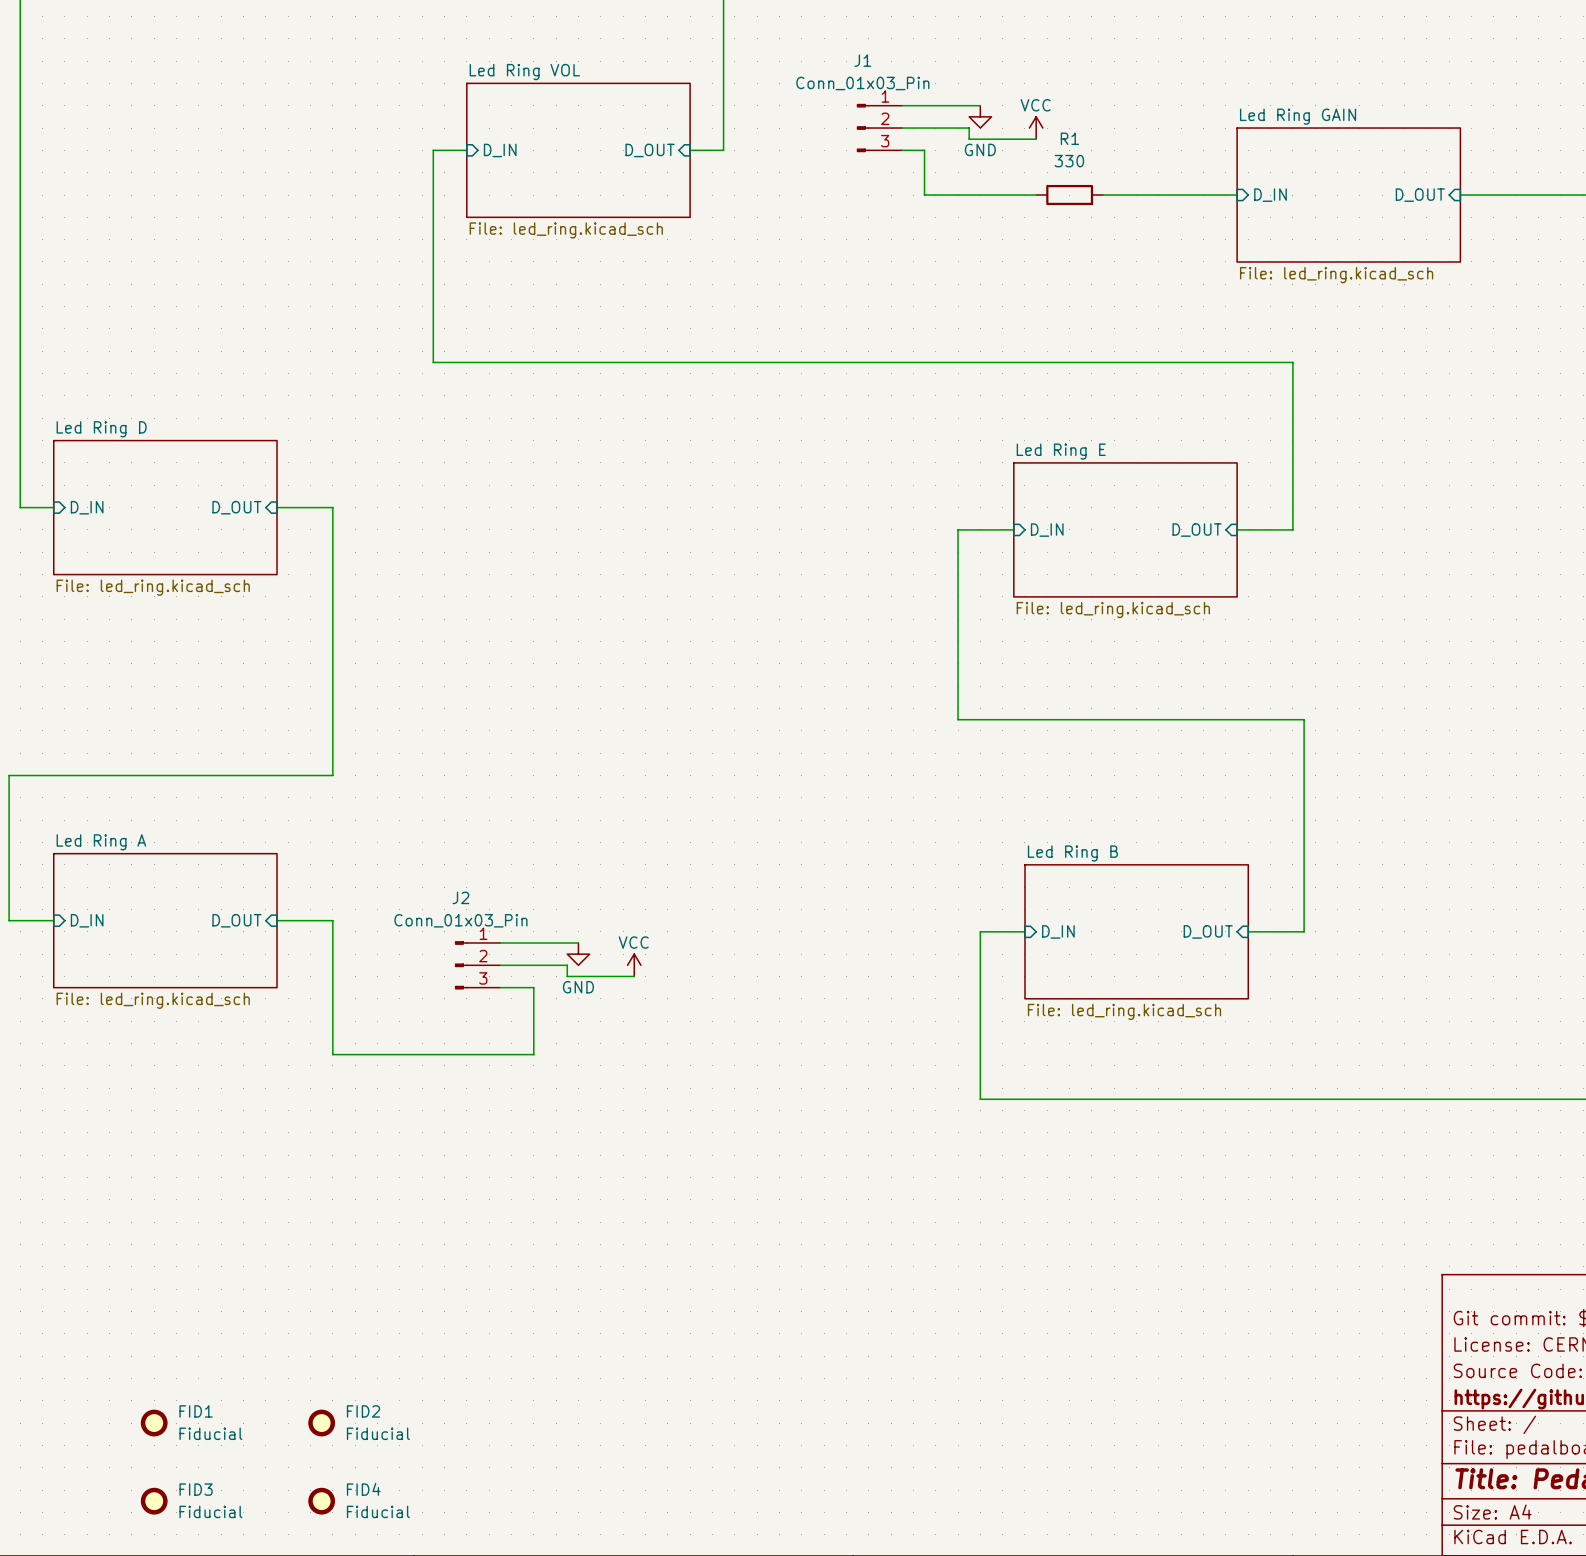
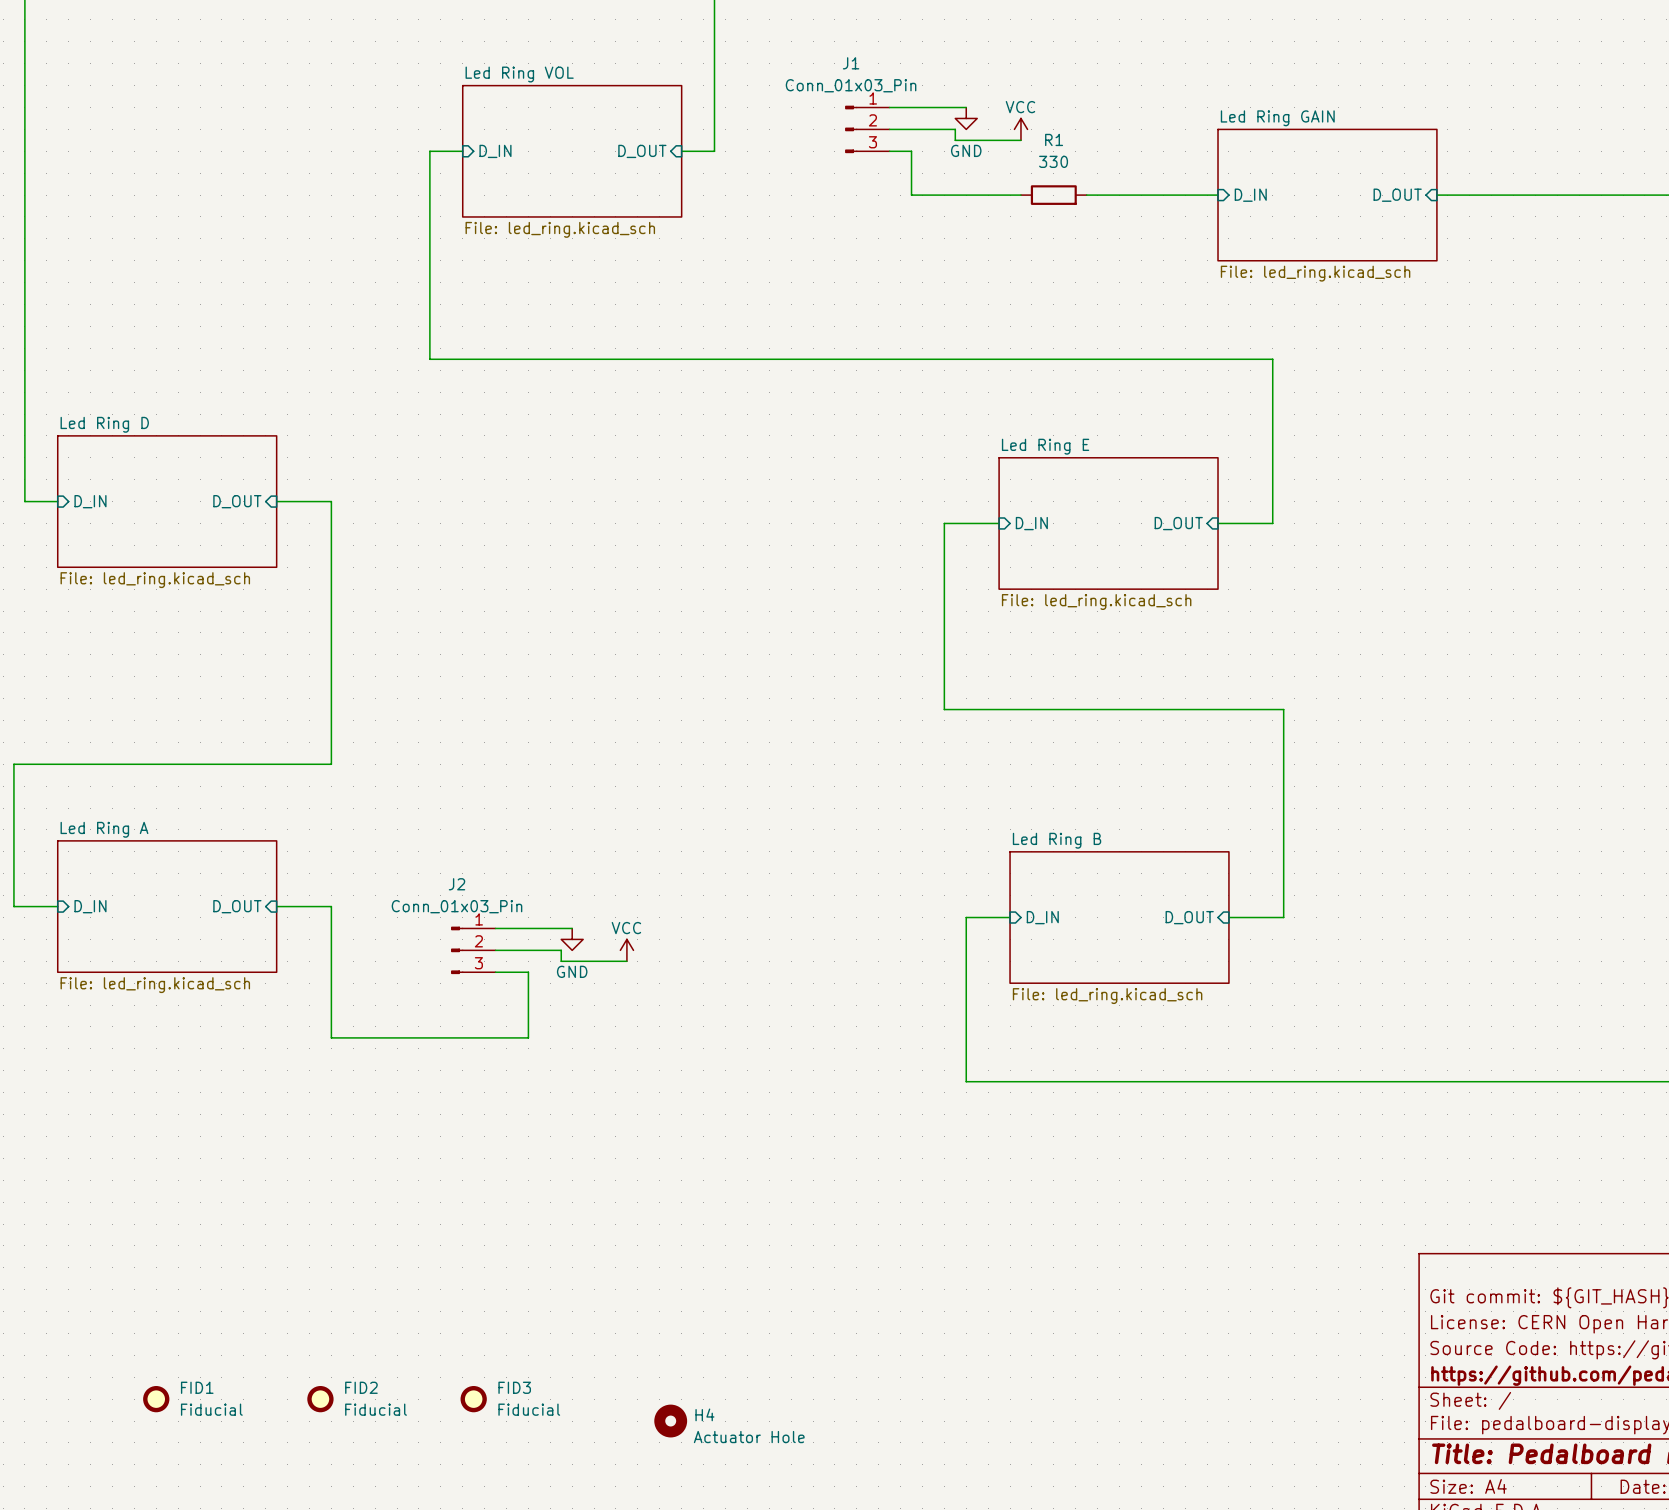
H4: none -> Actuator Hole (670, 1421)
FID3 position: (154, 1501) -> (473, 1399)
FID4: Fiducial (321, 1501) -> none

